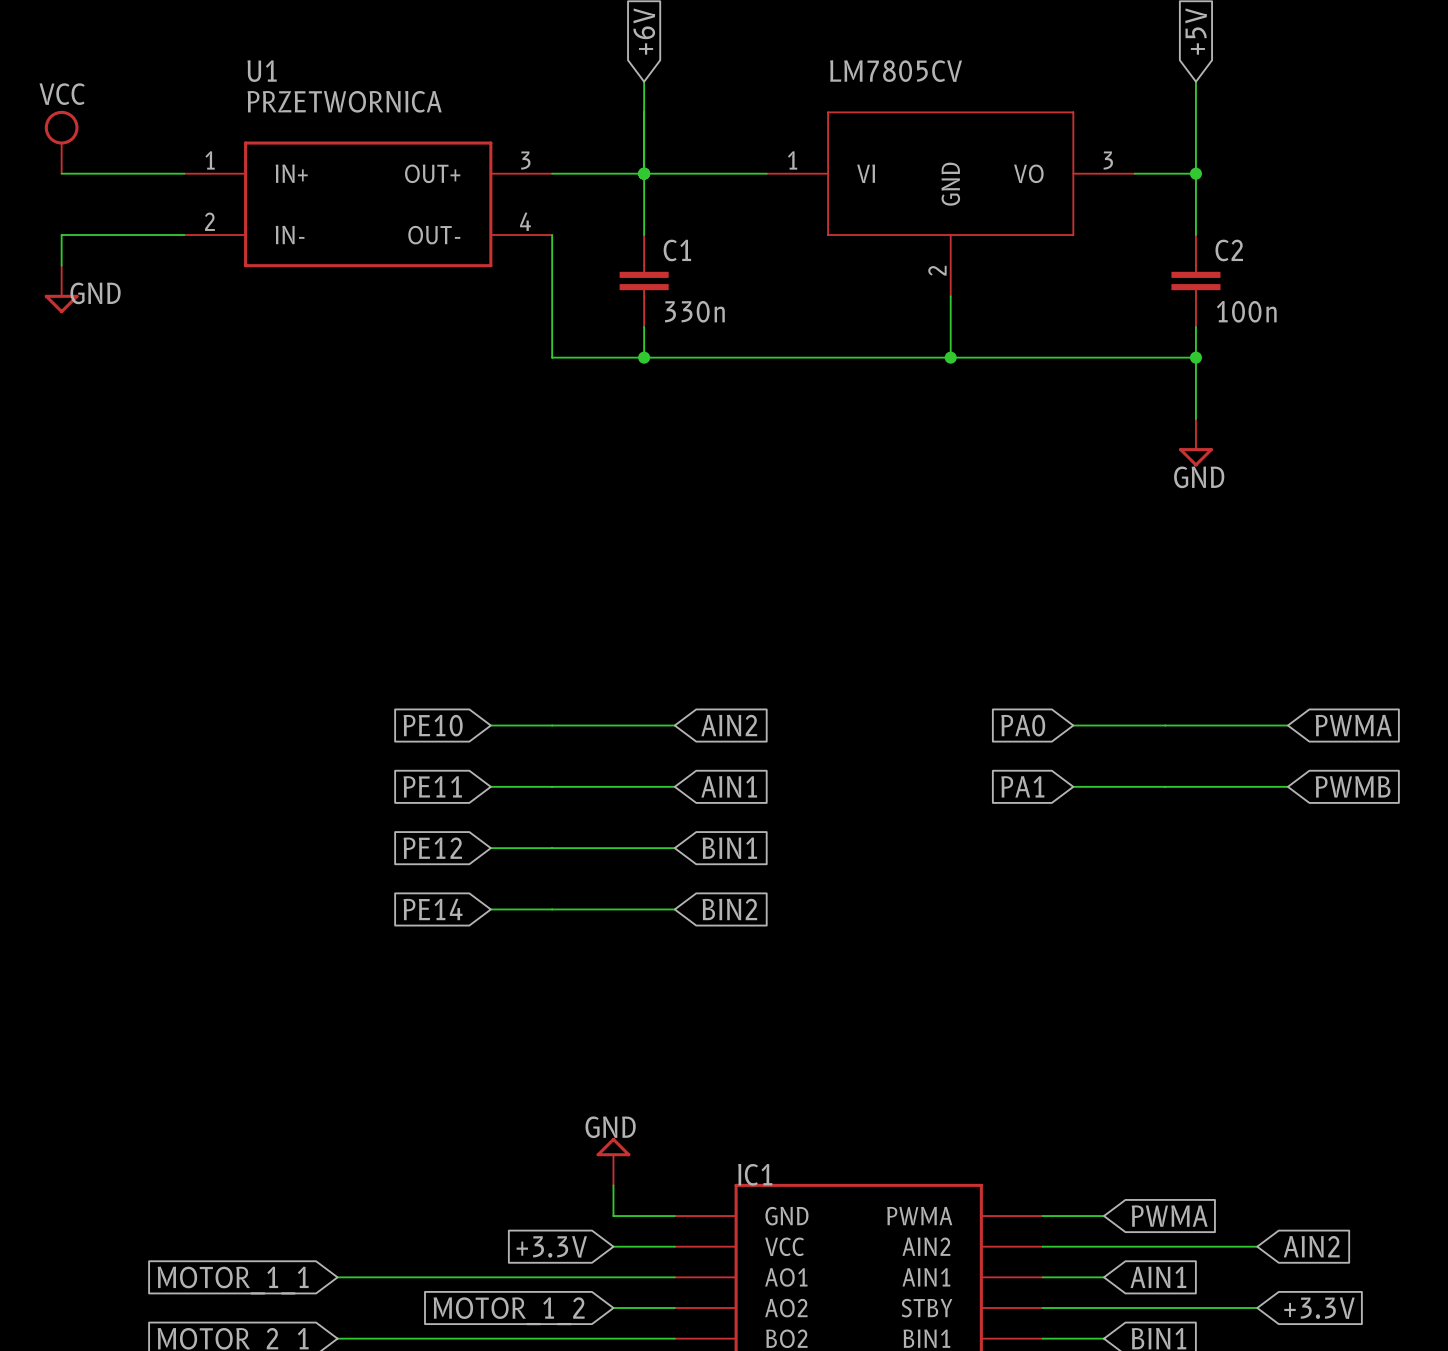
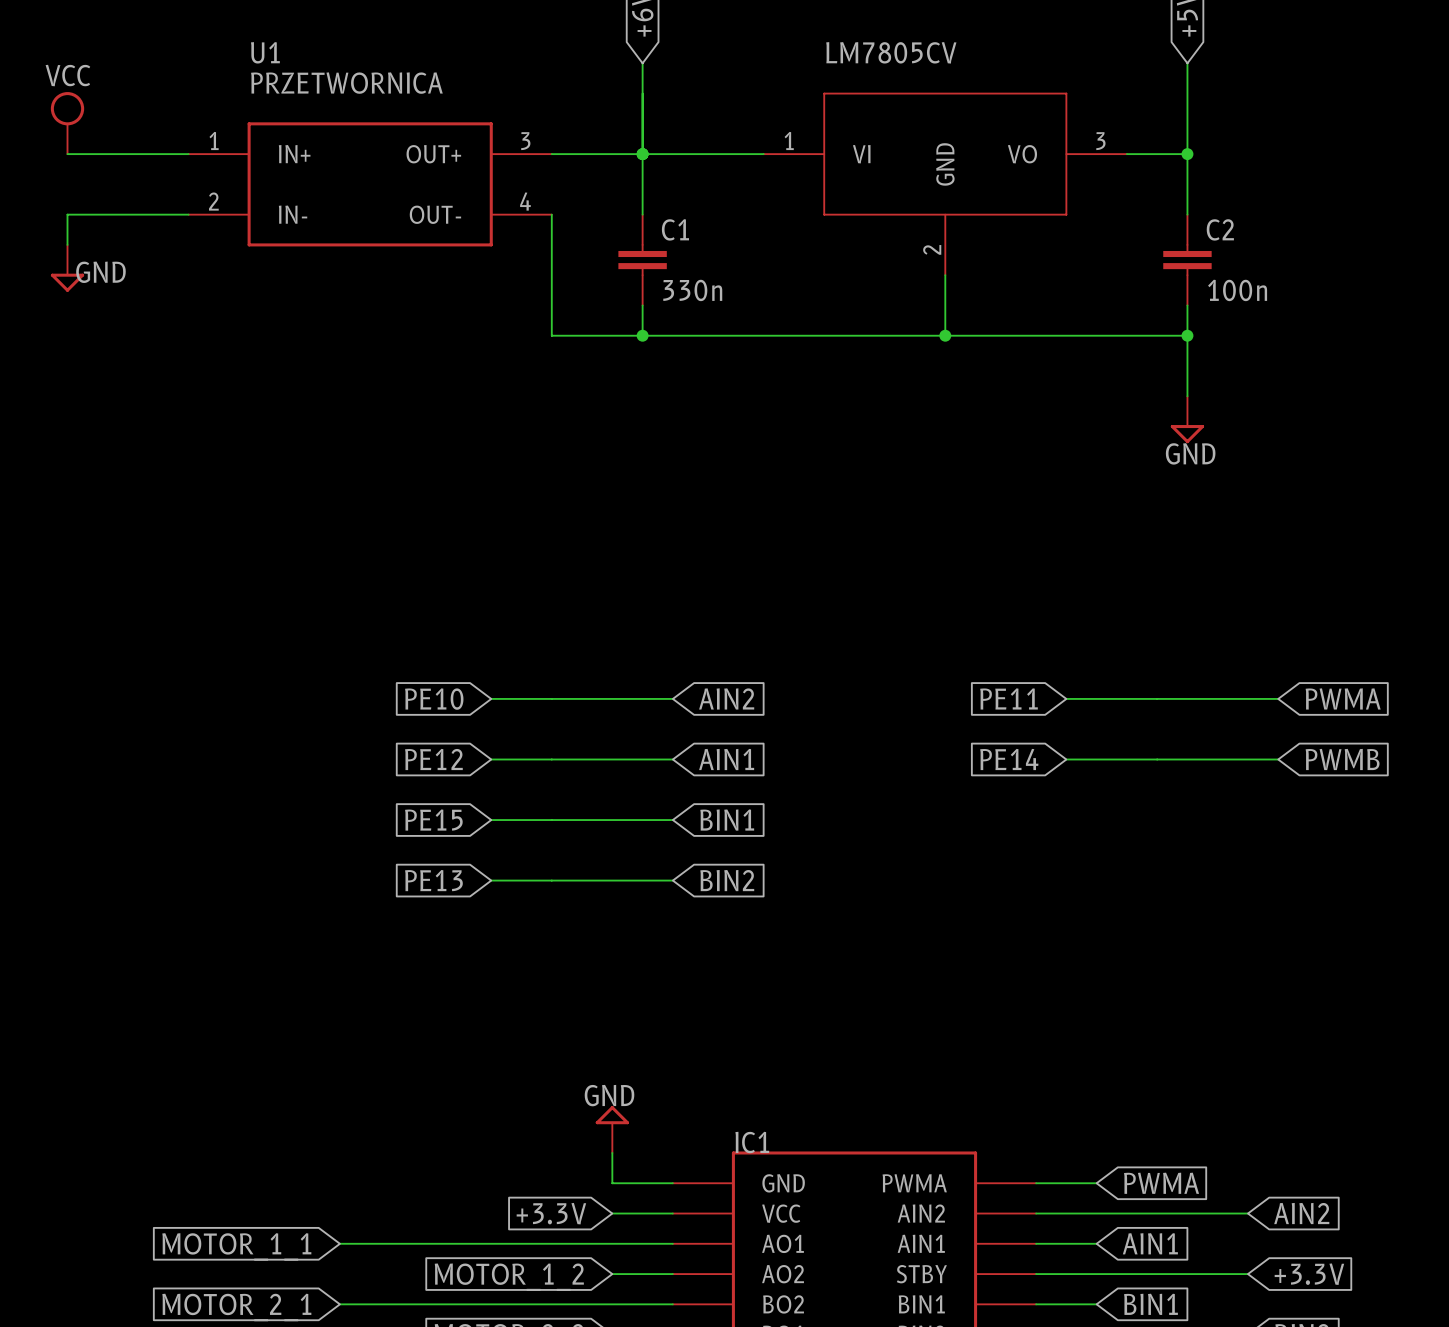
global label: PA0 (1023, 725) -> PE11 (1008, 698)
global label: PE11 (432, 786) -> PE12 (433, 759)
global label: PA1 (1022, 786) -> PE14 (1009, 759)
global label: PE12 (432, 848) -> PE15 (433, 820)
global label: PE14 (433, 909) -> PE13 (433, 880)

